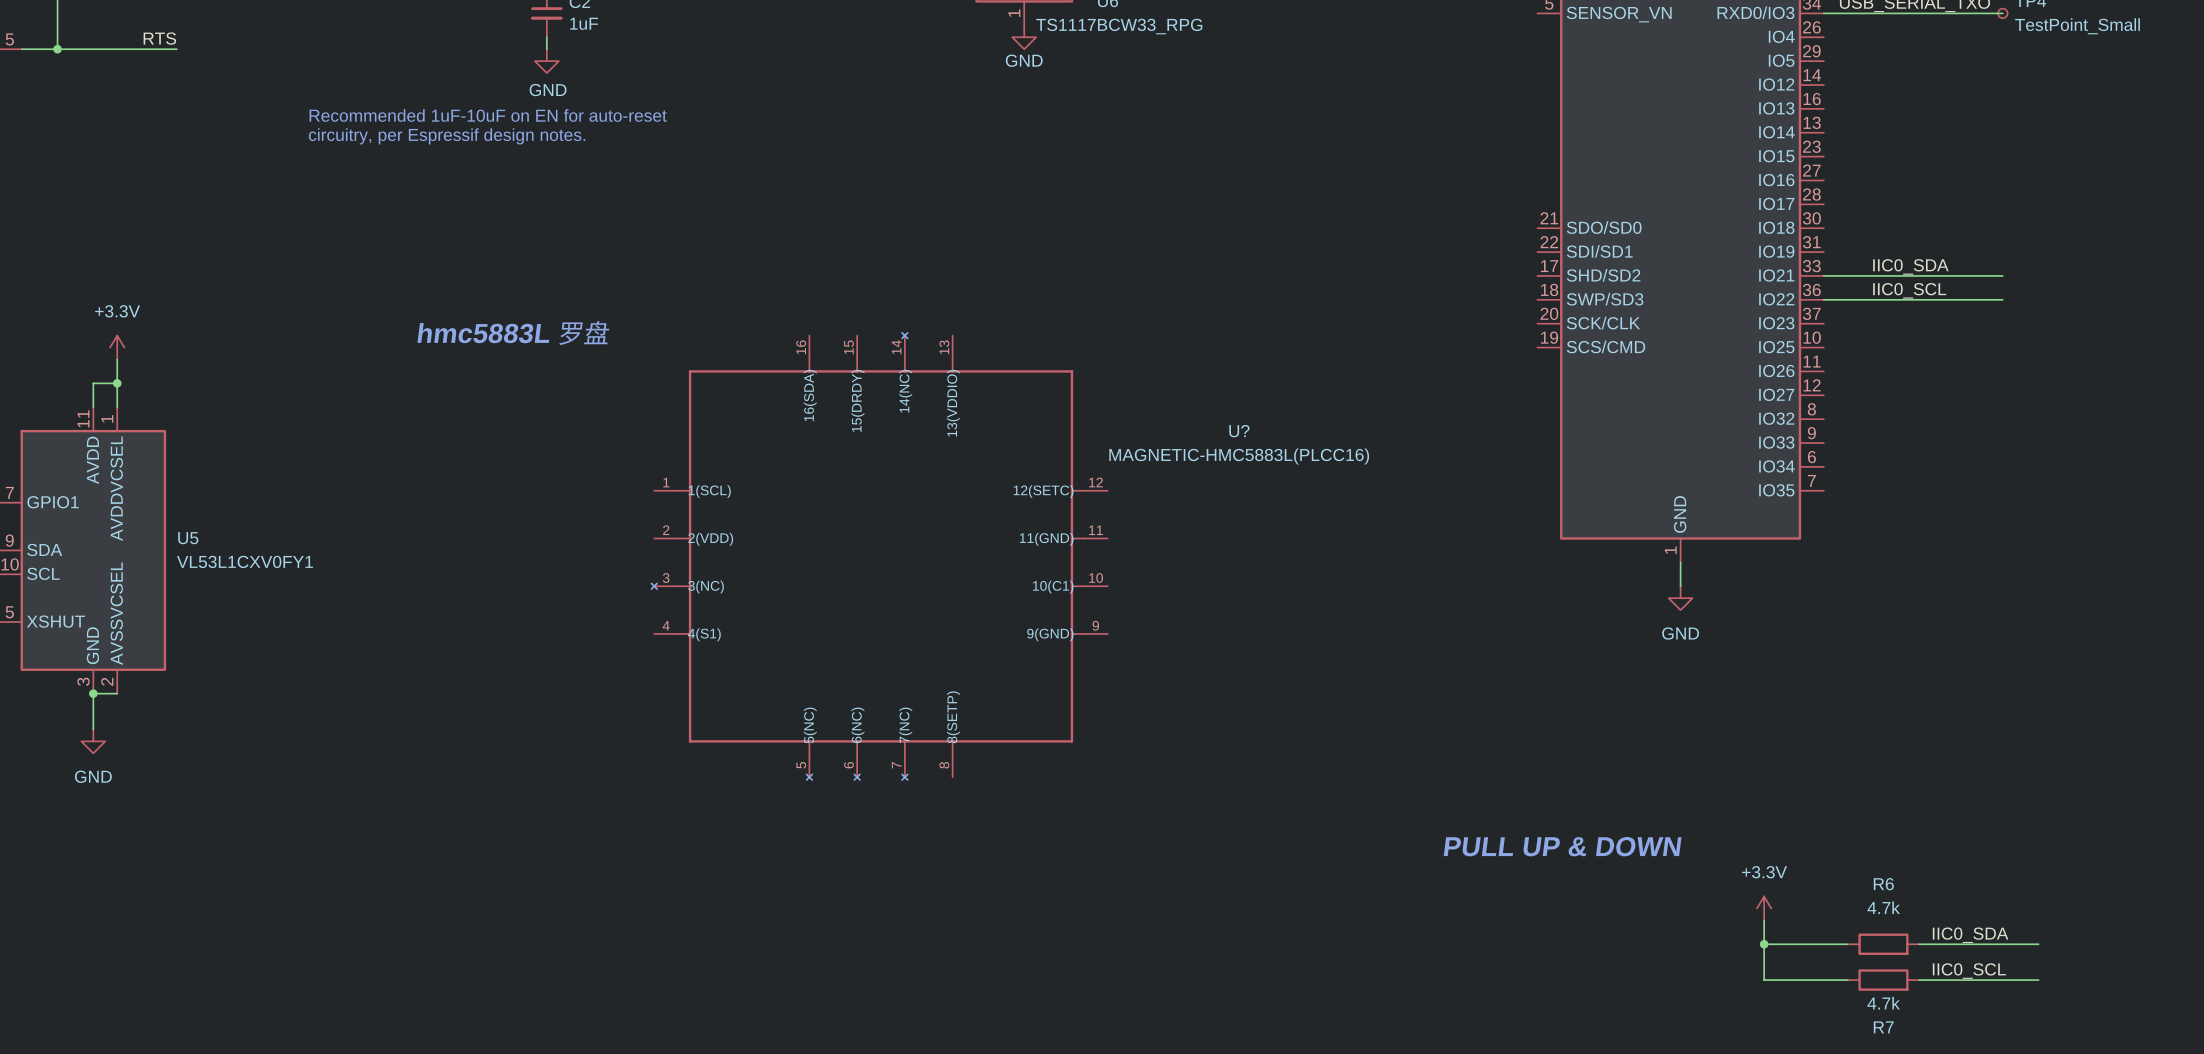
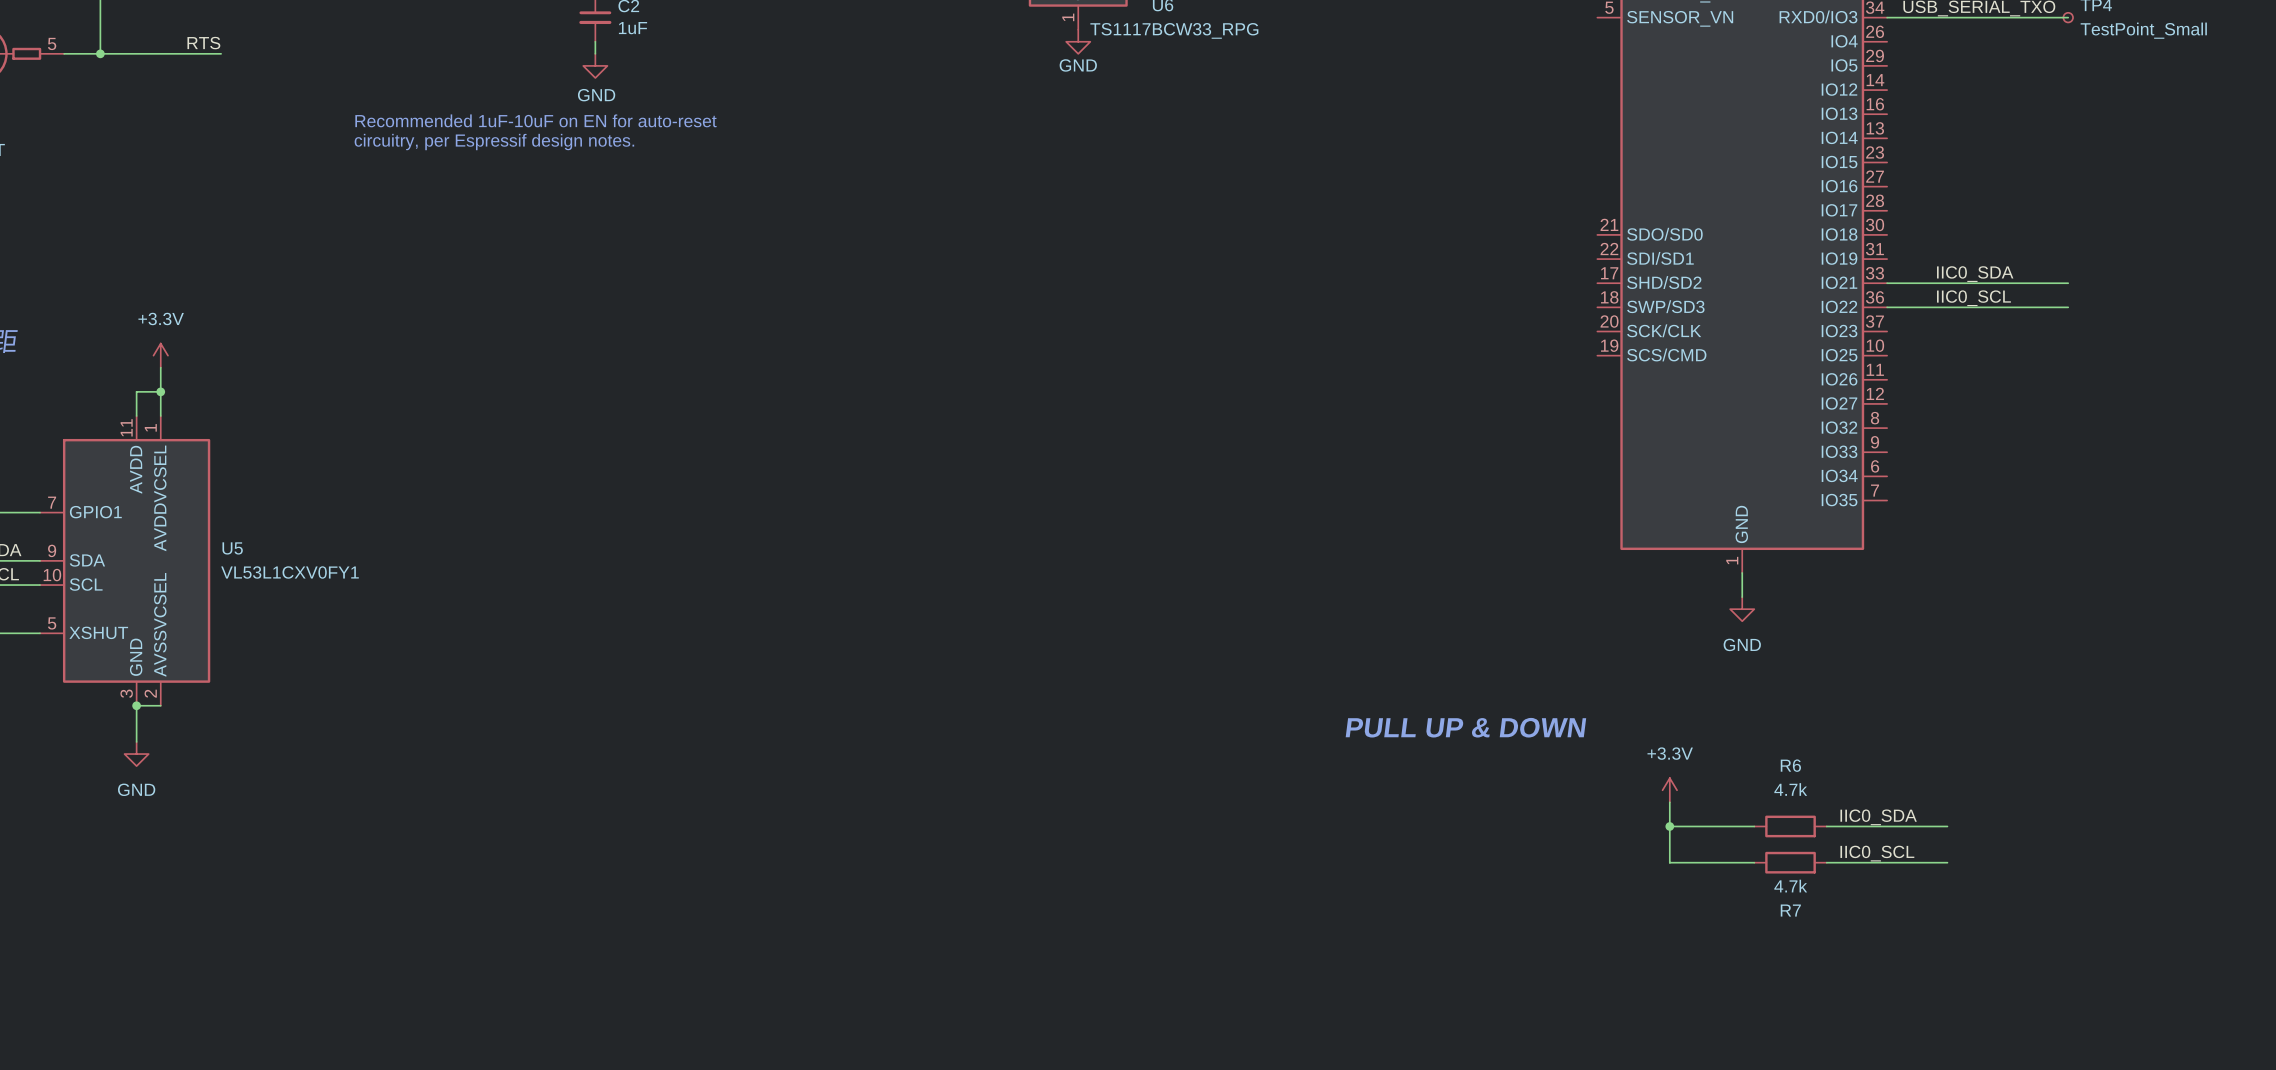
text: hmc5883L 罗盘 (513, 333) -> none
U?: MAGNETIC-HMC5883L(PLCC16) (879, 556) -> none
junction: none -> (1669, 826)
text position: PULL UP & DOWN (1562, 846) -> PULL UP & DOWN (1465, 727)
power symbol position: +3.3V (1764, 908) -> +3.3V (1669, 790)
wire: (1764, 920) (1764, 980) (1847, 980) -> (1669, 802) (1669, 862) (1754, 862)
label position: IIC0_SDA (1970, 935) -> IIC0_SDA (1878, 817)
wire: (1764, 944) (1847, 944) -> (1669, 826) (1754, 826)
junction: (1764, 944) -> none
R6 position: (1883, 944) -> (1790, 826)
wire: (1919, 944) (2038, 944) -> (1826, 826) (1947, 826)
label position: IIC0_SCL (1969, 971) -> IIC0_SCL (1877, 853)
R7 position: (1883, 980) -> (1790, 862)
wire: (1919, 980) (2038, 980) -> (1826, 862) (1947, 862)

